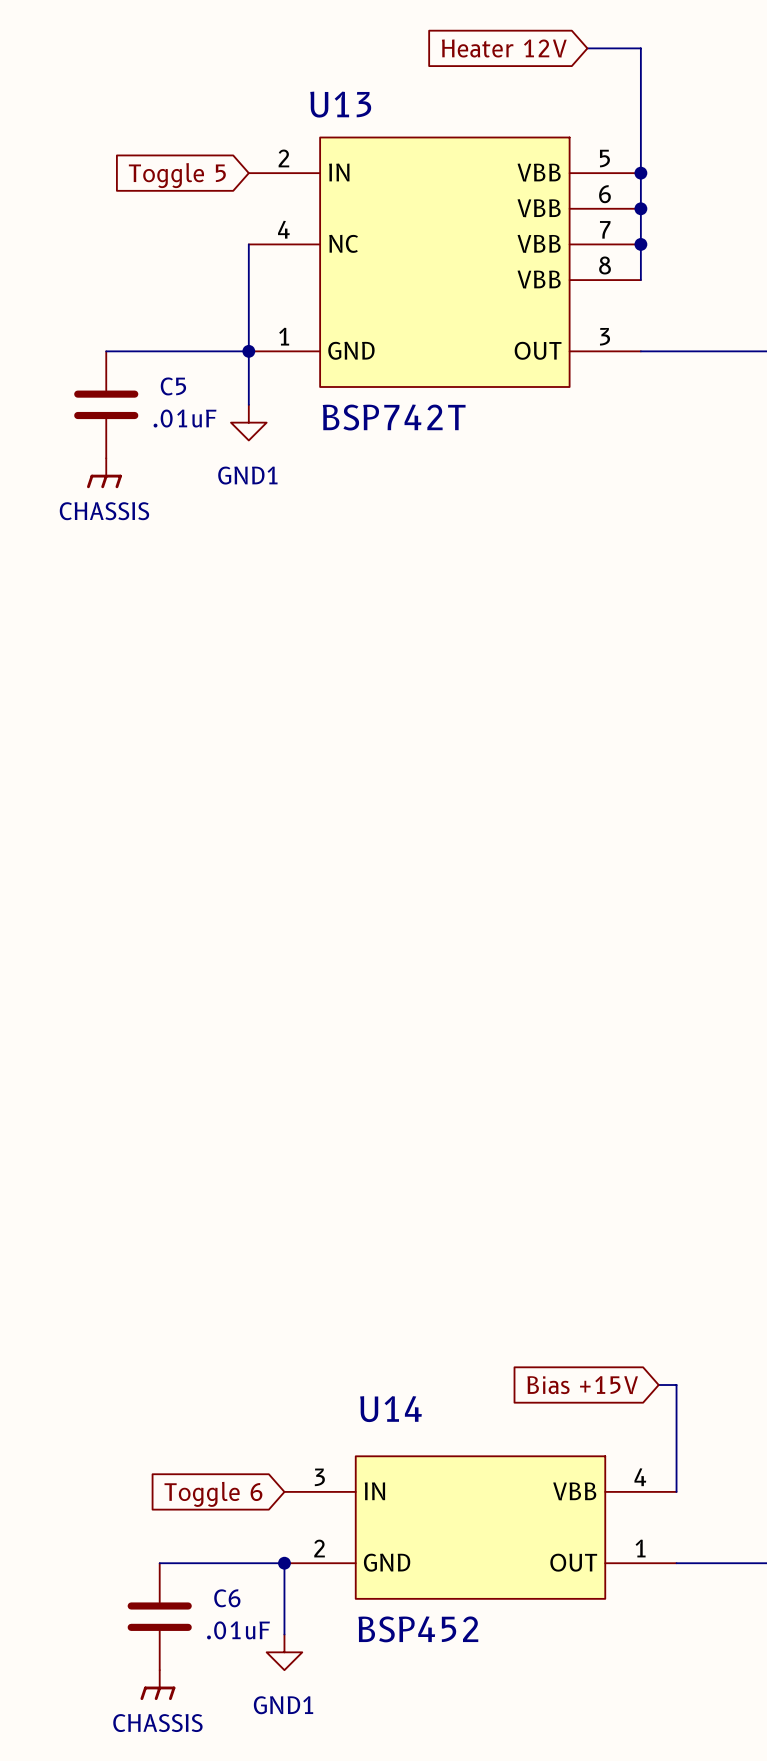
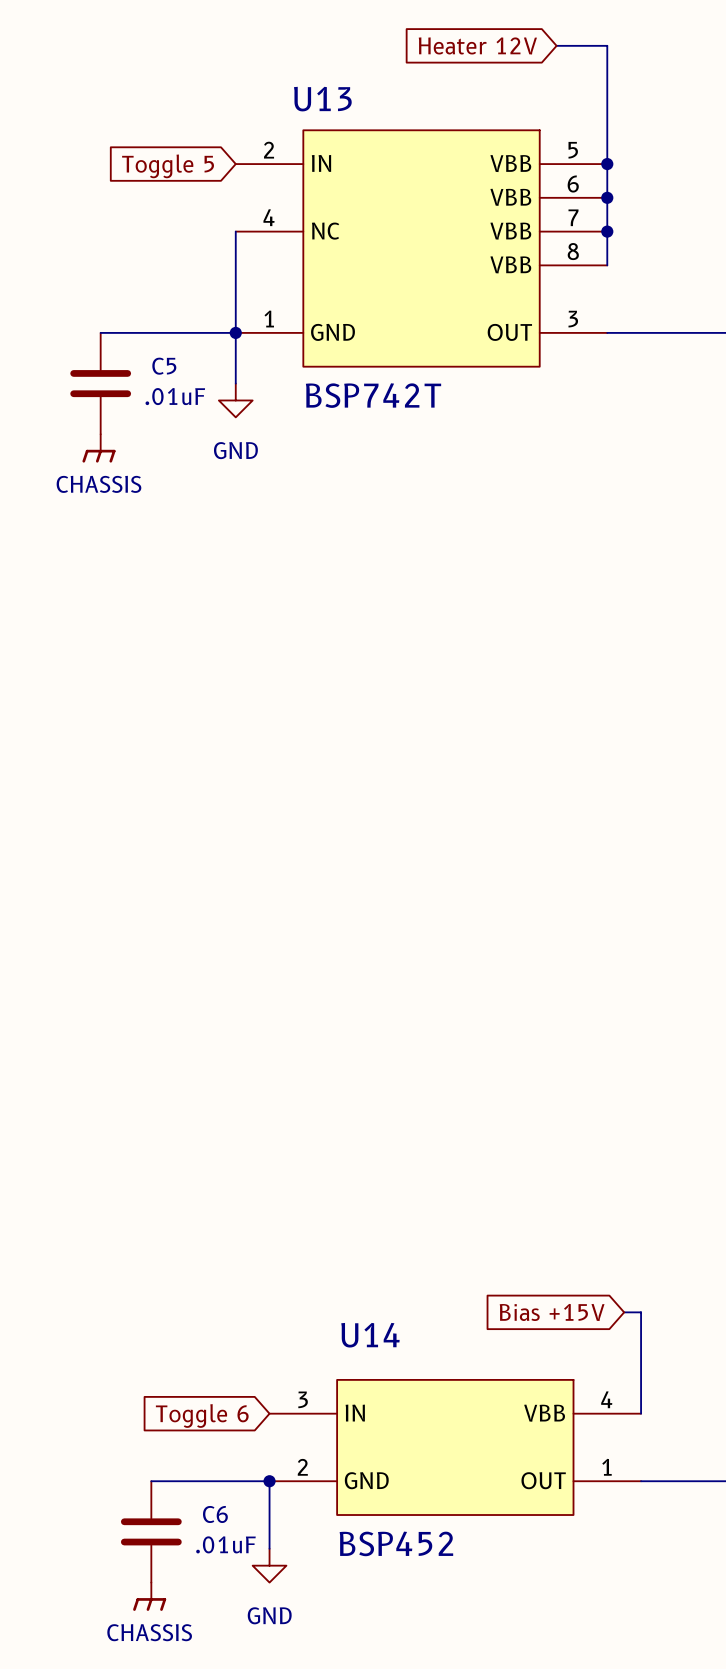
power symbol: GND1 (248, 422) -> GND (235, 400)
power symbol: GND1 (284, 1652) -> GND (269, 1565)

